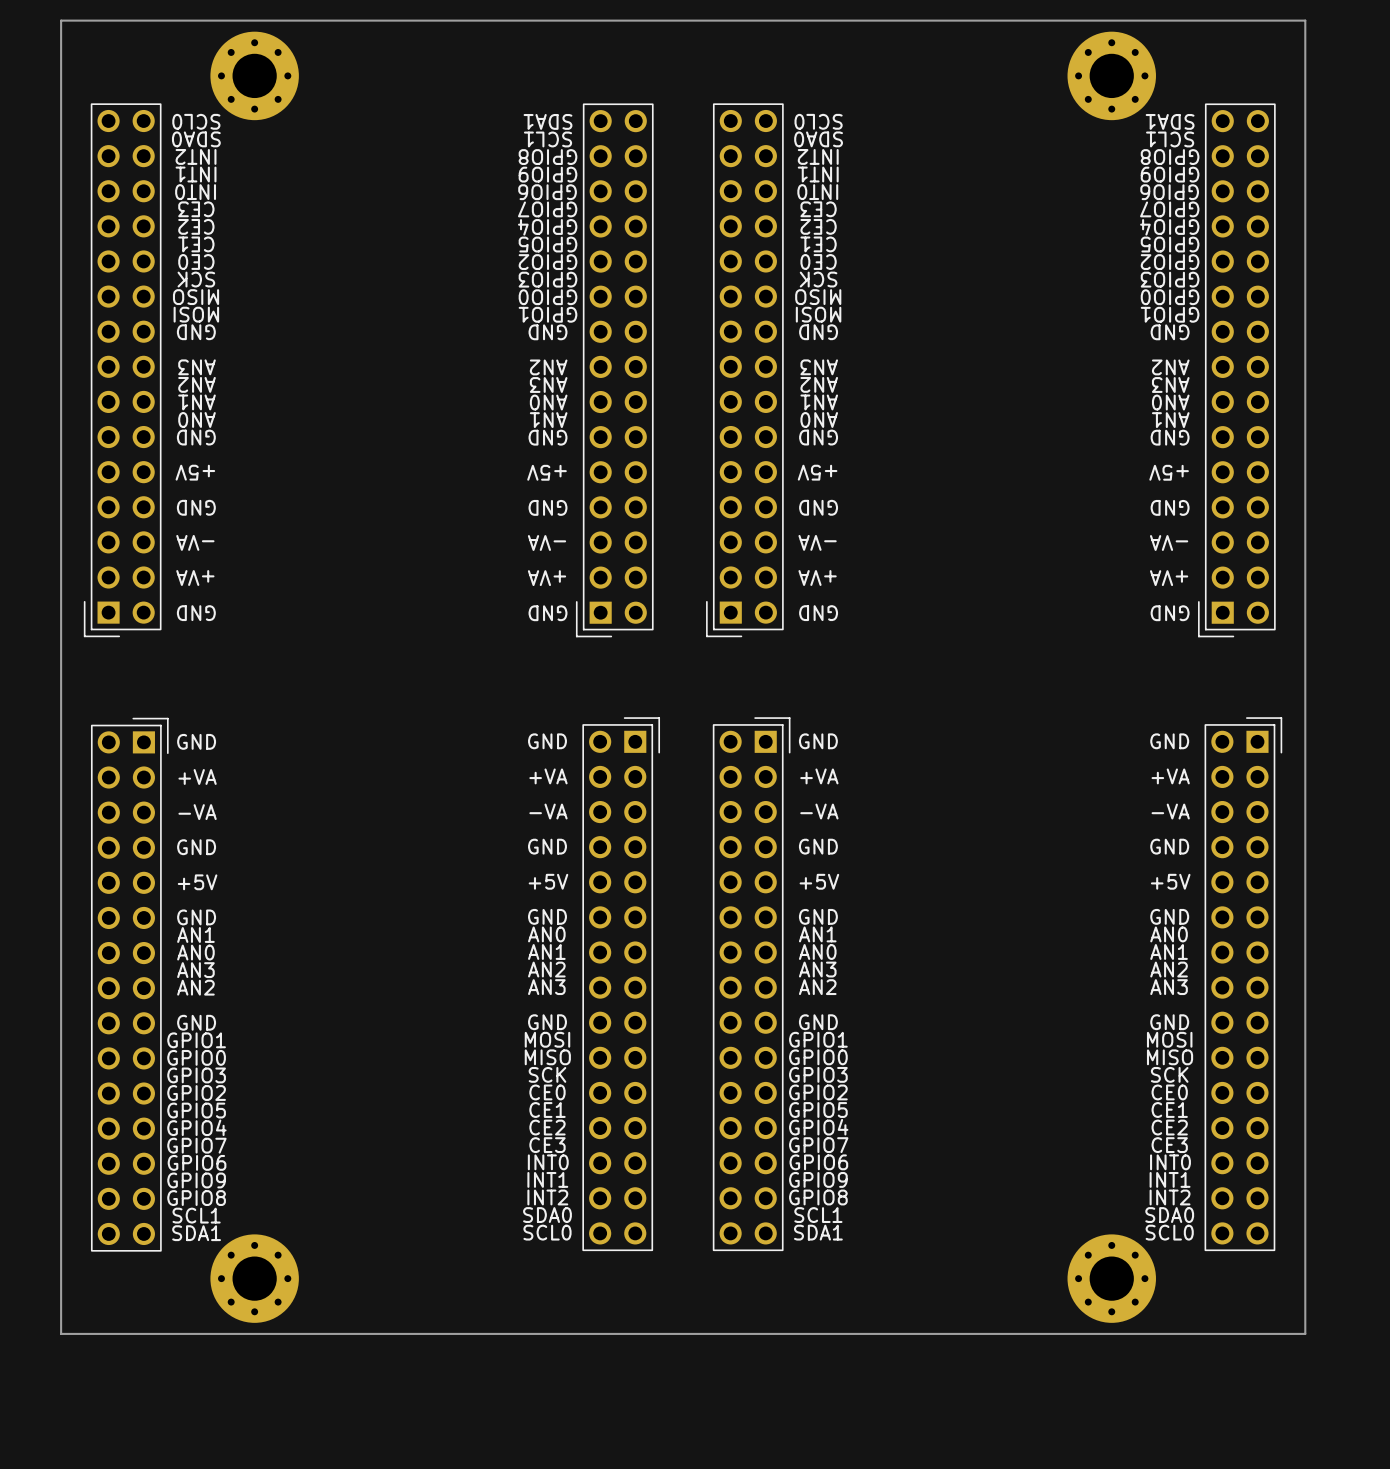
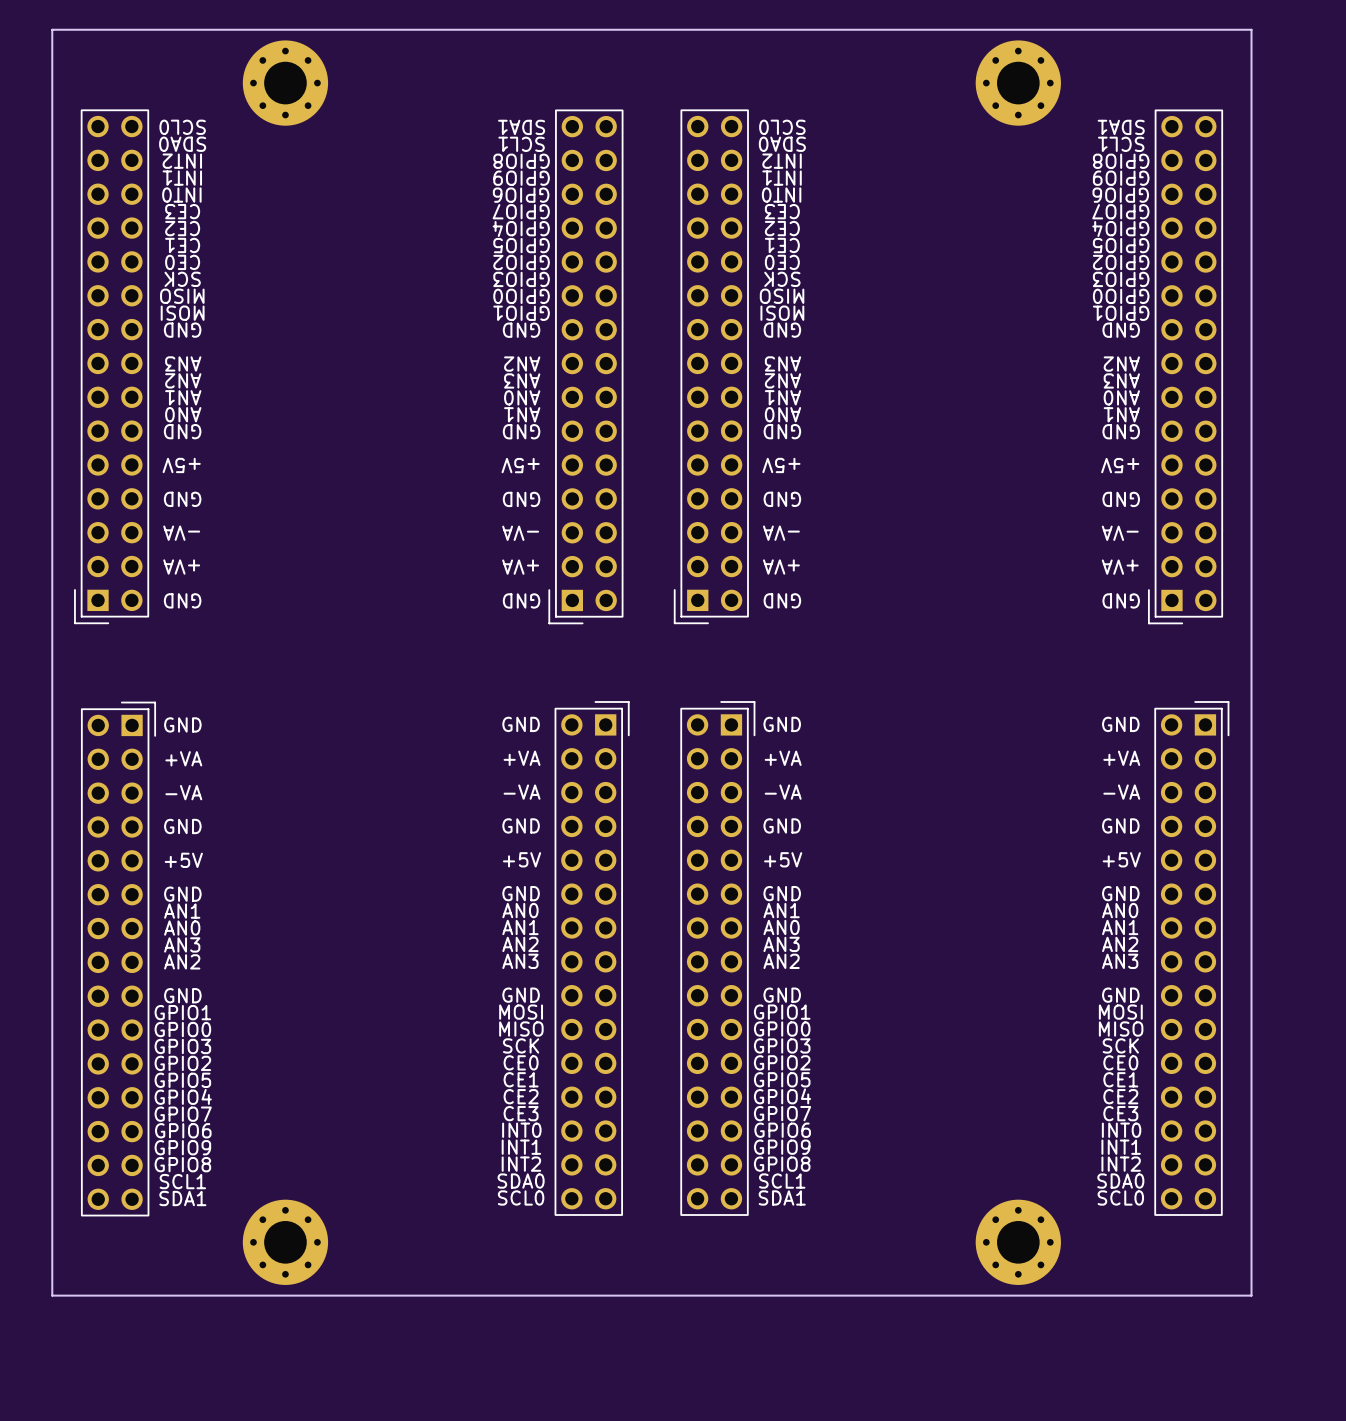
part position: (254, 75) -> (285, 83)
part position: (1111, 75) -> (1018, 83)
part position: (254, 1278) -> (285, 1242)
part position: (1111, 1278) -> (1018, 1242)

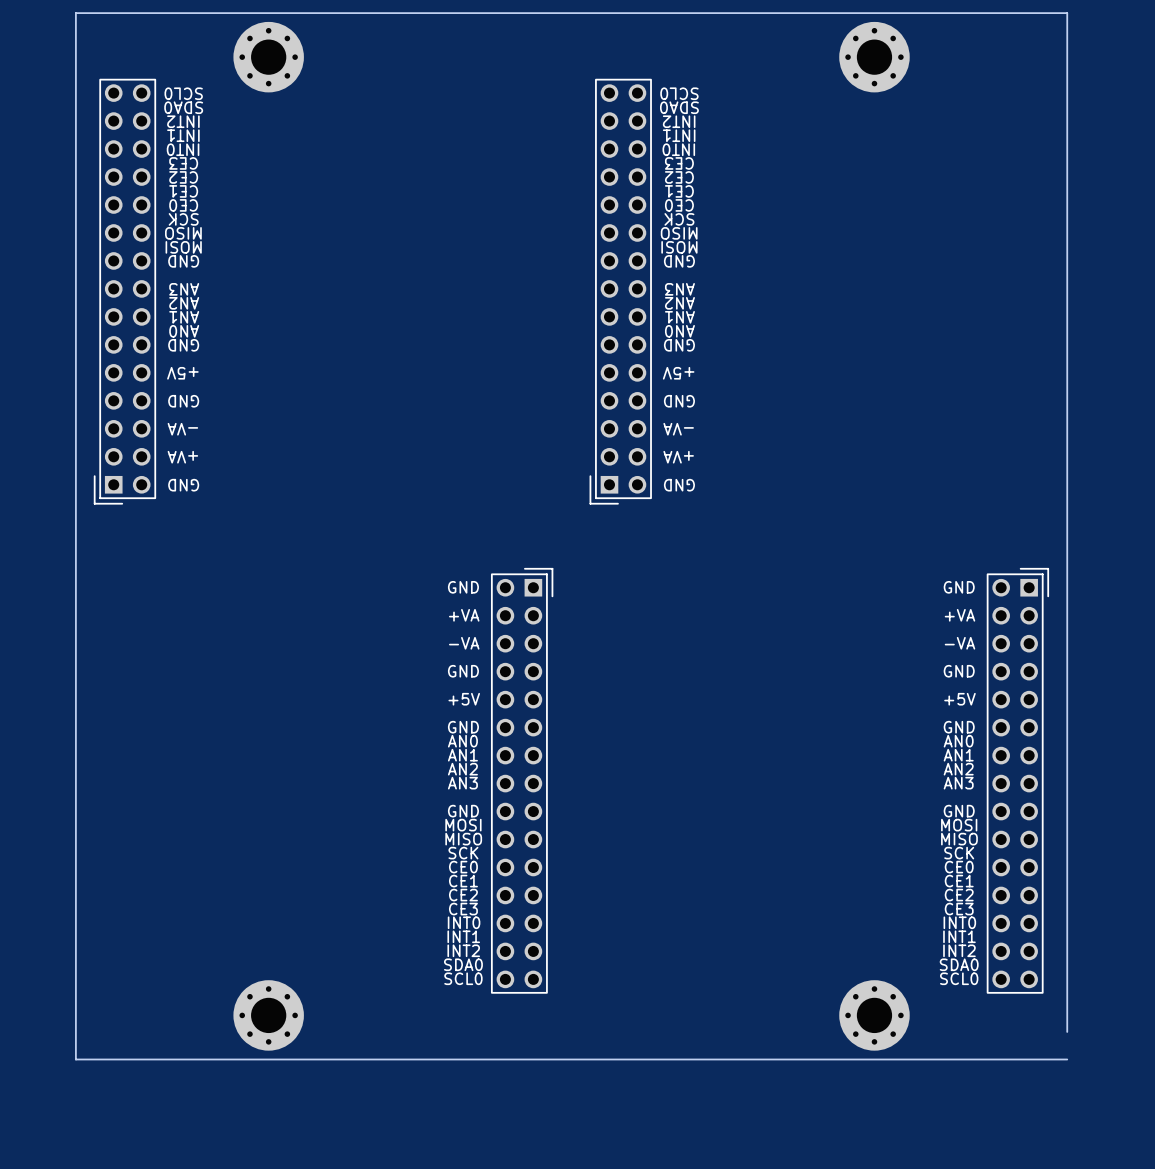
part: (585, 366) -> none
part: (1185, 366) -> none
part: (717, 958) -> none
part: (118, 959) -> none
board edge: (1251, 1262) (1251, 1295) -> none

